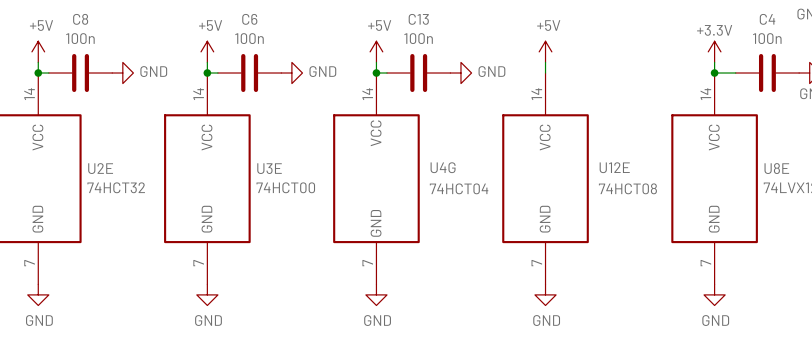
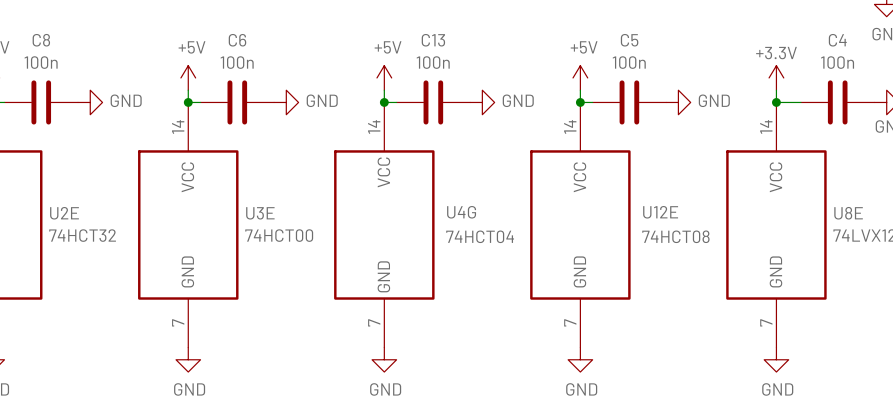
wire: none -> (580, 102) (592, 102)
junction: none -> (580, 102)
C5: none -> 100n (629, 102)
power symbol: none -> GND (678, 102)

